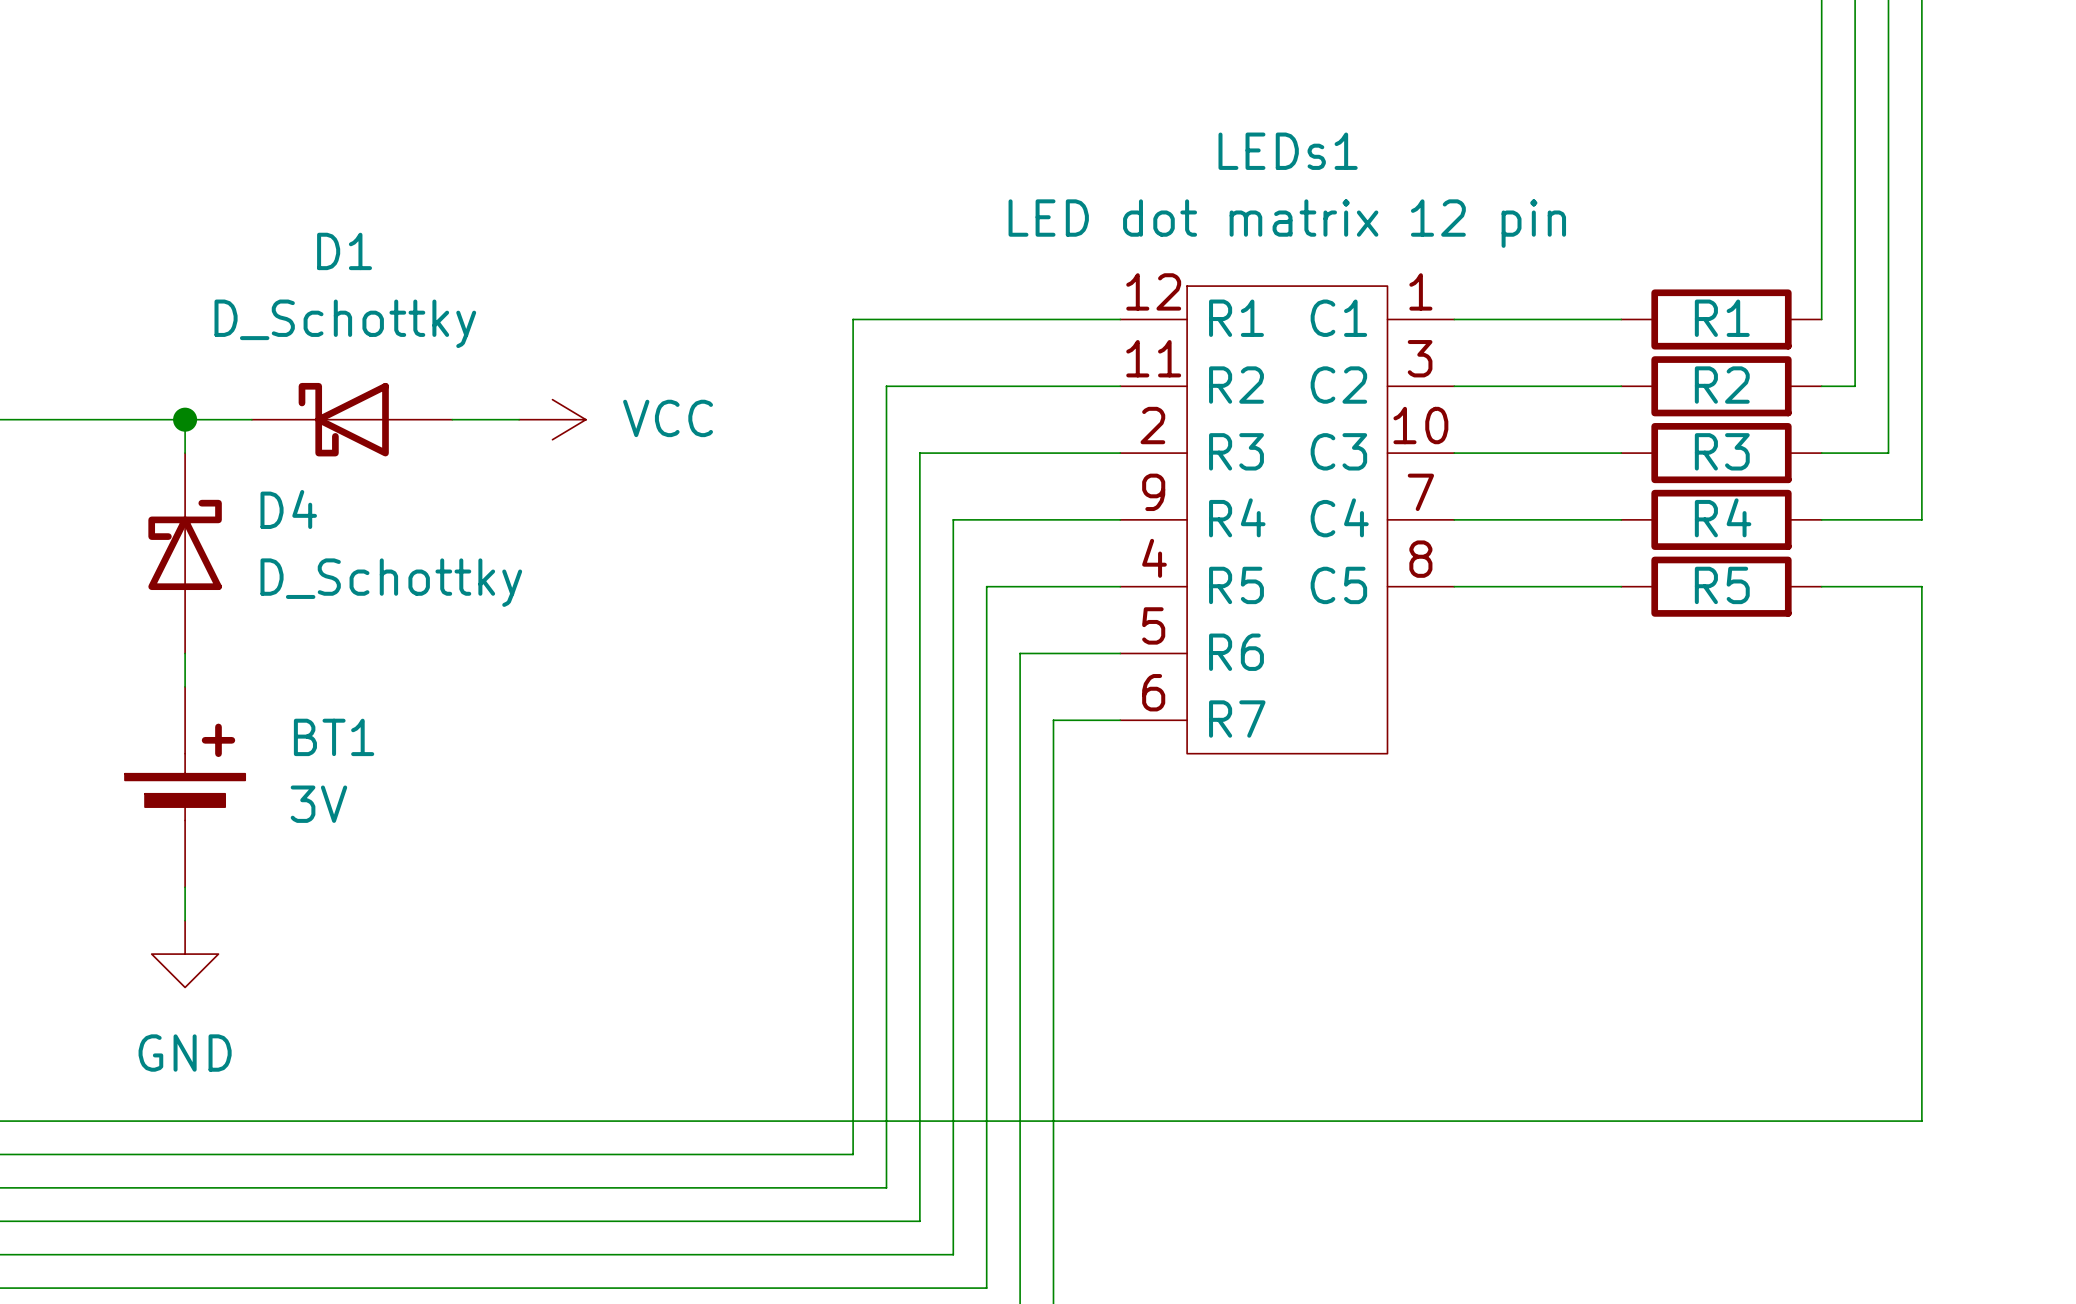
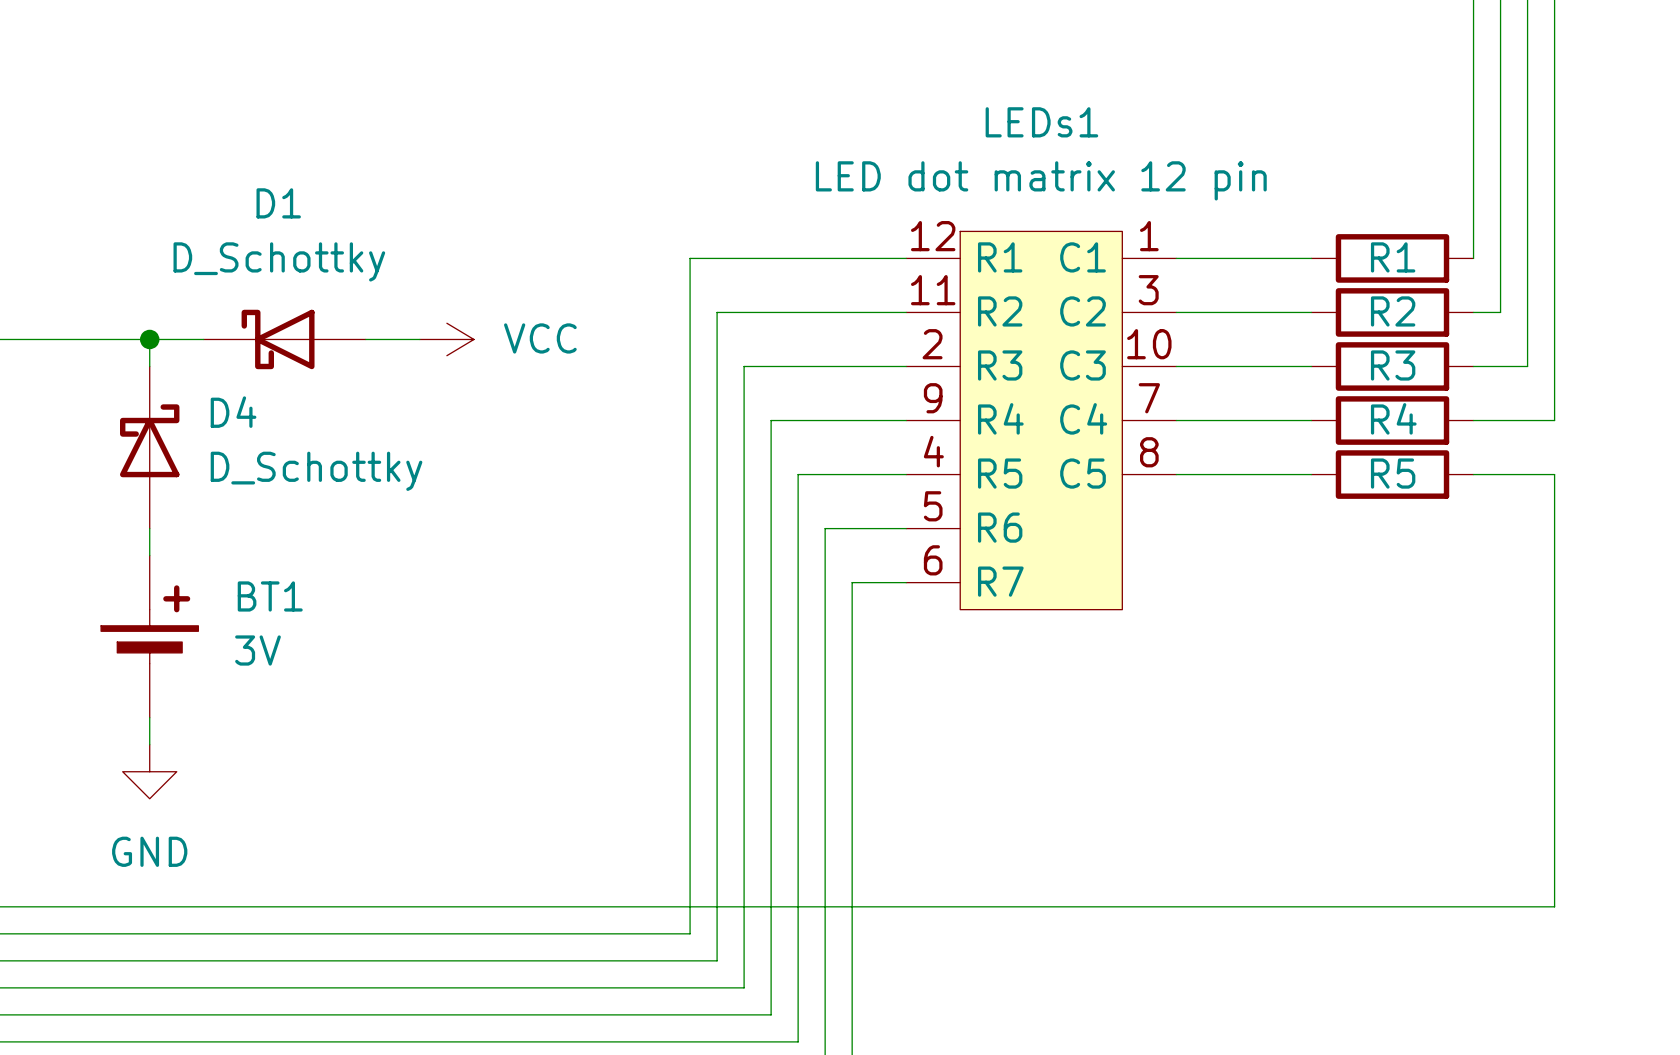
LEDs1 symbol: [1120, 286, 1455, 754] -> [906, 231, 1177, 610]

